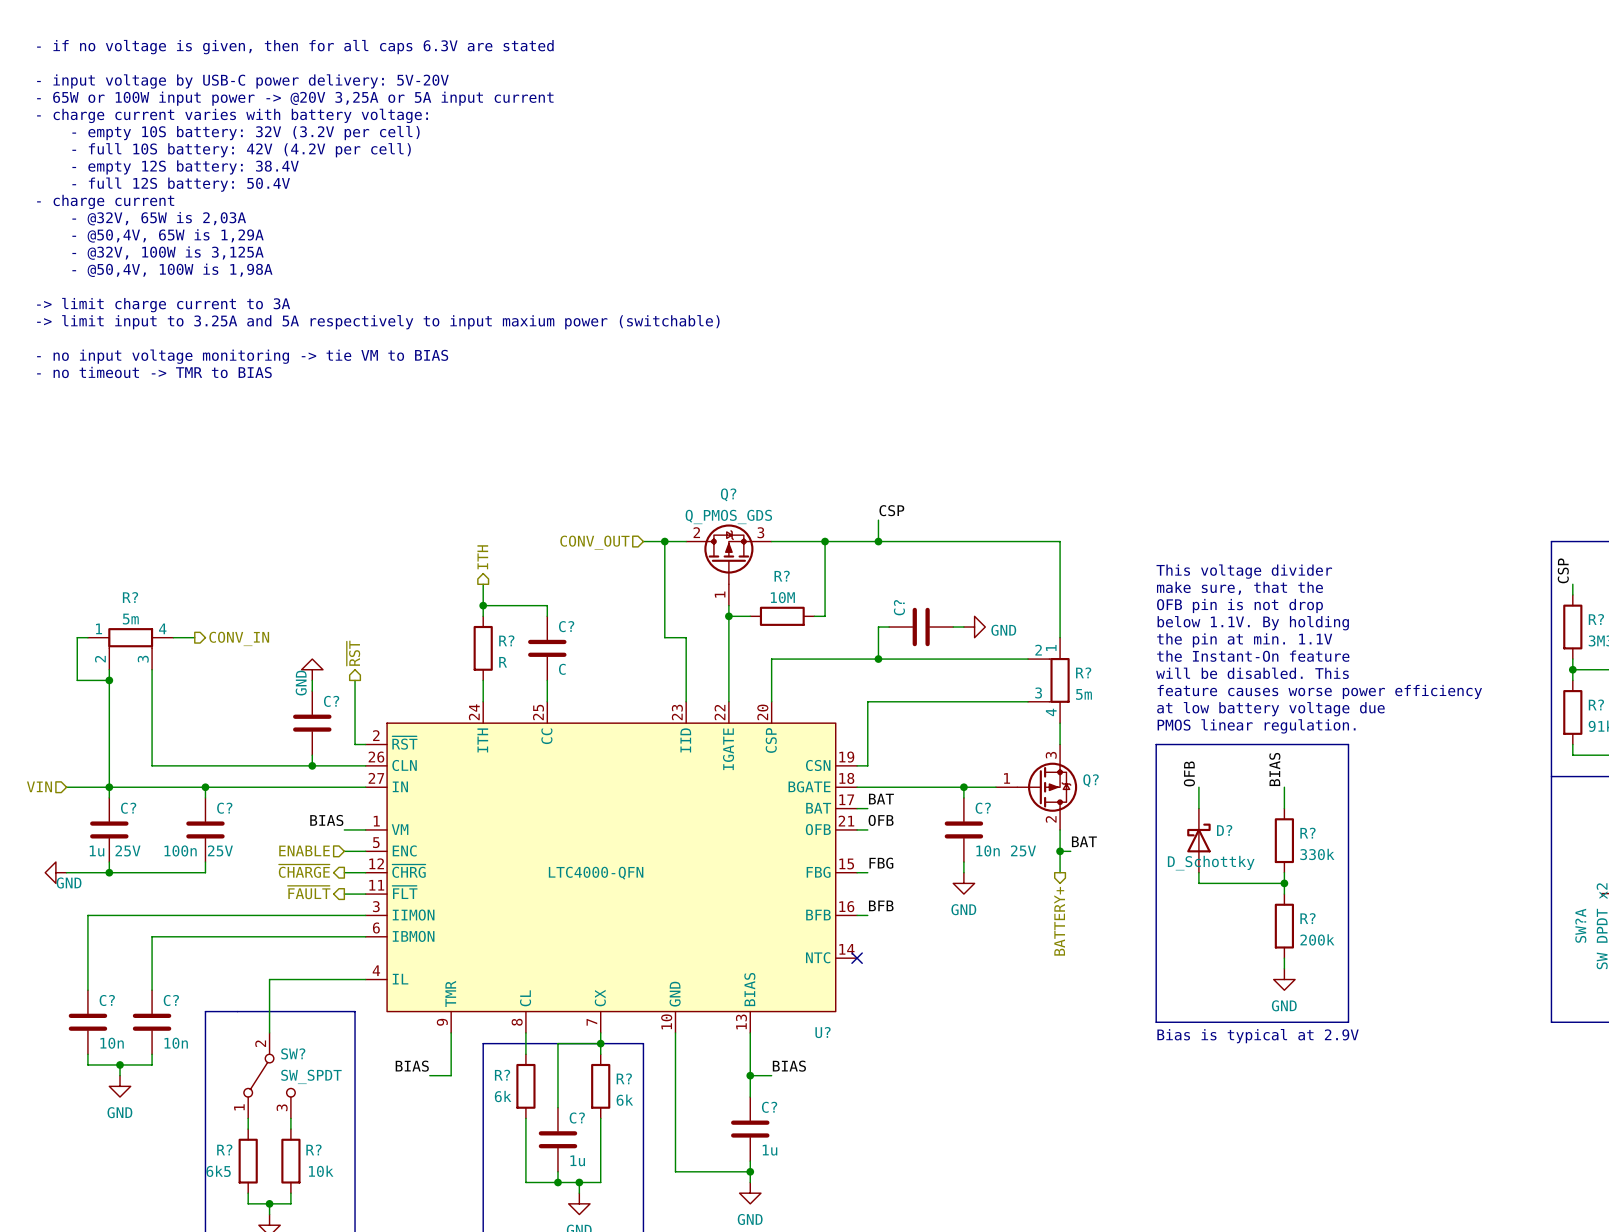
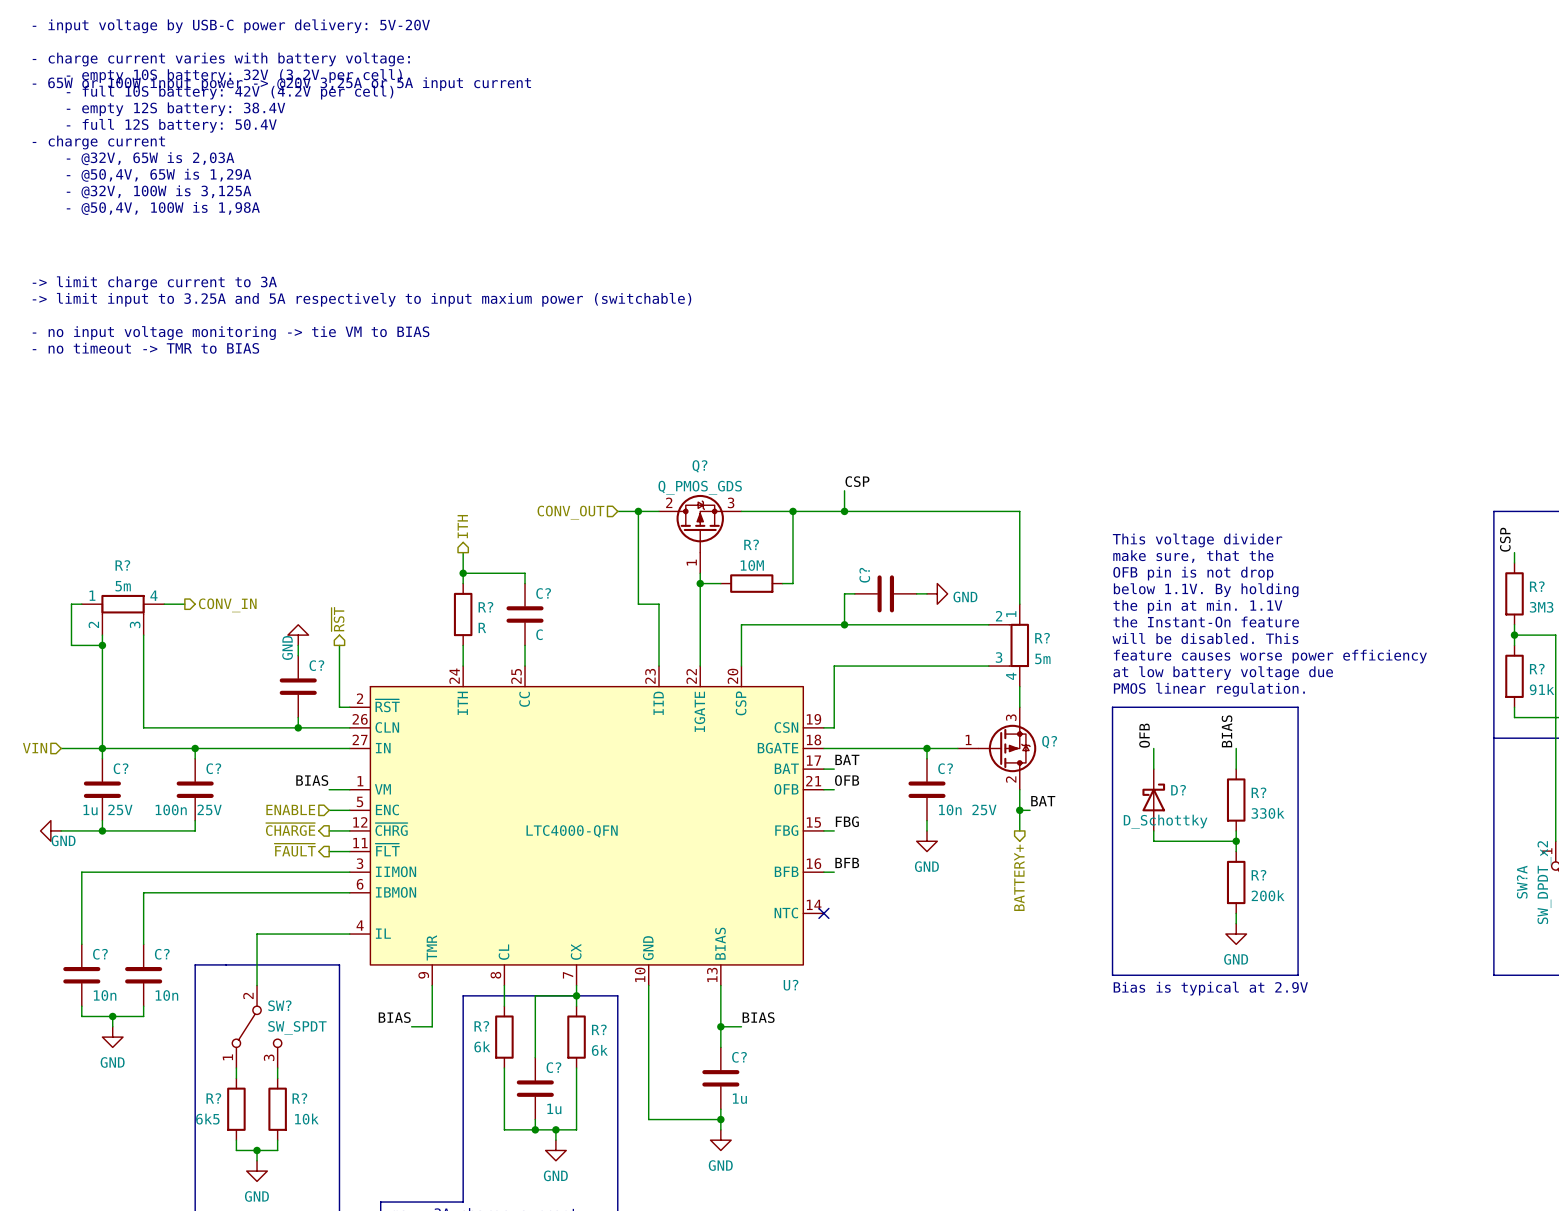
text: - if no voltage is given, then for all caps 6.3V are stated (295, 47) -> none
text position: - input voltage by USB-C power delivery: 5V-20V (242, 81) -> - input voltage by USB-C power delivery: 5V-20V (231, 26)
text position: - charge current varies with battery voltage: (232, 115) -> - charge current varies with battery voltage: (221, 59)
text position: - empty 10S battery: 32V (3.2V per cell) (246, 133) -> - empty 10S battery: 32V (3.2V per cell) (234, 76)
text position: - full 10S battery: 42V (4.2V per cell) (241, 150) -> - full 10S battery: 42V (4.2V per cell) (230, 92)
text position: - empty 12S battery: 38.4V (185, 167) -> - empty 12S battery: 38.4V (175, 109)
text position: - full 12S battery: 50.4V (181, 184) -> - full 12S battery: 50.4V (171, 125)
text position: - charge current (105, 201) -> - charge current (98, 142)
text position: - @32V, 65W is 2,03A (159, 218) -> - @32V, 65W is 2,03A (150, 158)
text position: - @50,4V, 65W is 1,29A (168, 235) -> - @50,4V, 65W is 1,29A (159, 175)
text position: - @32V, 100W is 3,125A (168, 253) -> - @32V, 100W is 3,125A (159, 191)
text position: - @50,4V, 100W is 1,98A (172, 270) -> - @50,4V, 100W is 1,98A (163, 208)

